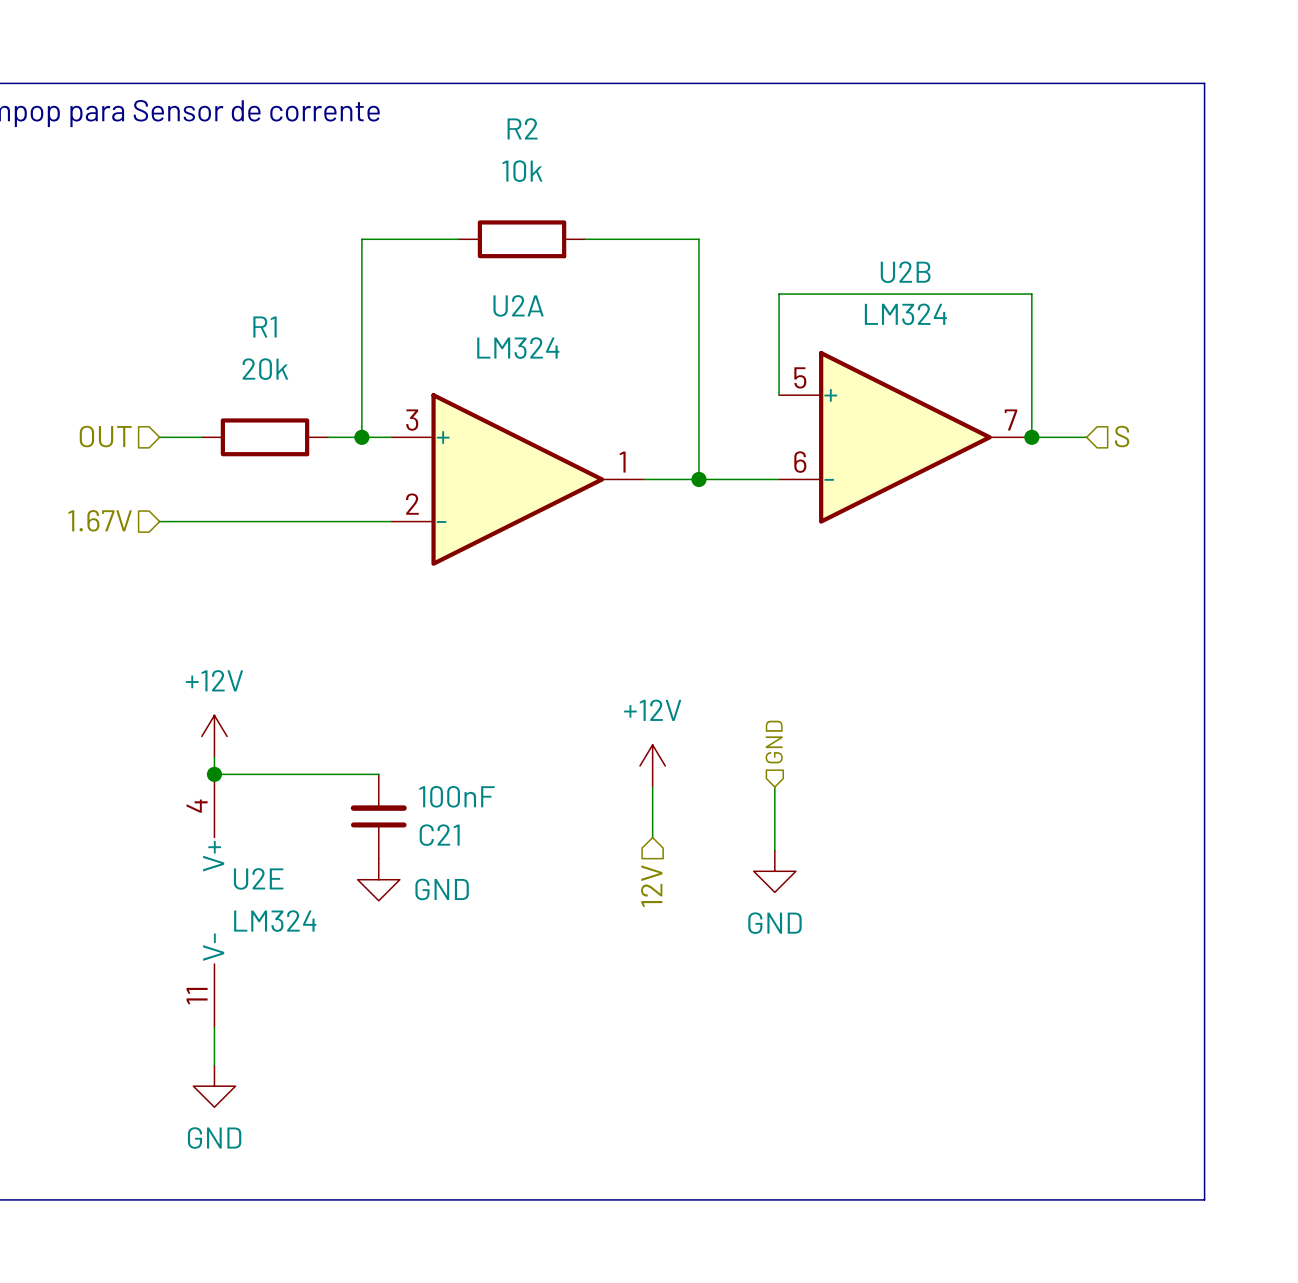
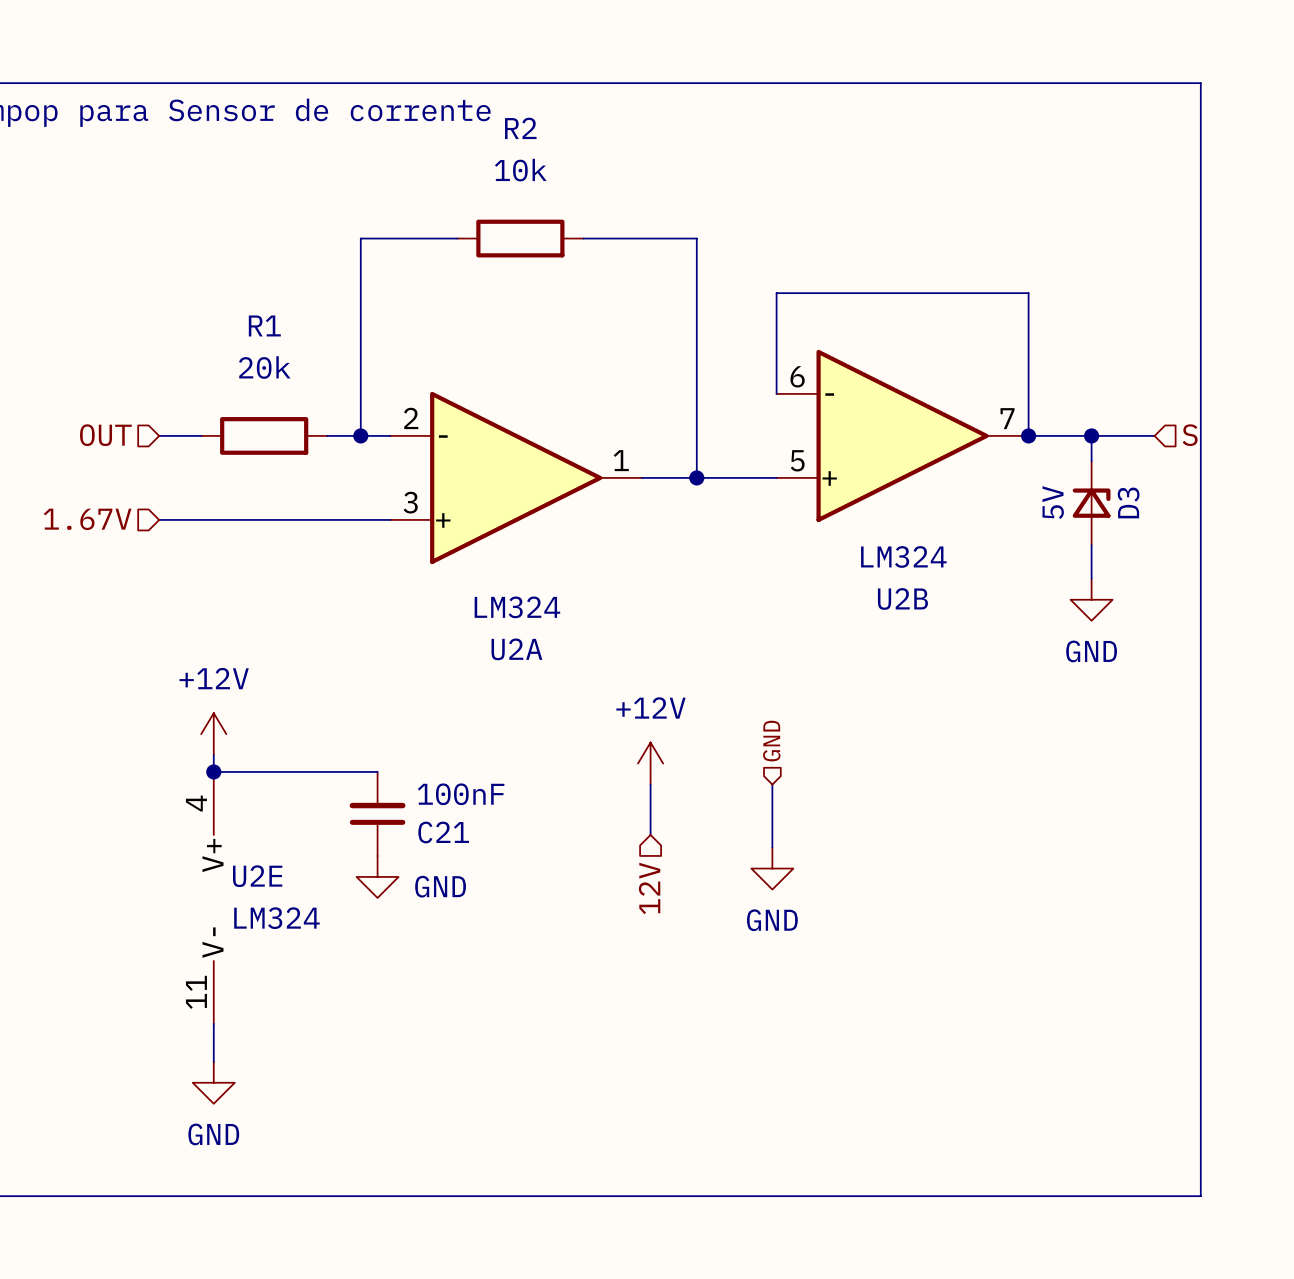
hierarchical label position: S (1122, 436) -> S (1190, 435)
U2B flip: as is (905, 437) -> up-down (902, 435)
wire: none -> (1083, 435) (1154, 435)
wire: none -> (1091, 435) (1091, 461)
junction: none -> (1091, 435)
U2A flip: as is (517, 479) -> up-down (516, 477)
D3: none -> 5V (1091, 503)
wire: none -> (1091, 545) (1091, 578)
power symbol: none -> GND (1091, 599)

